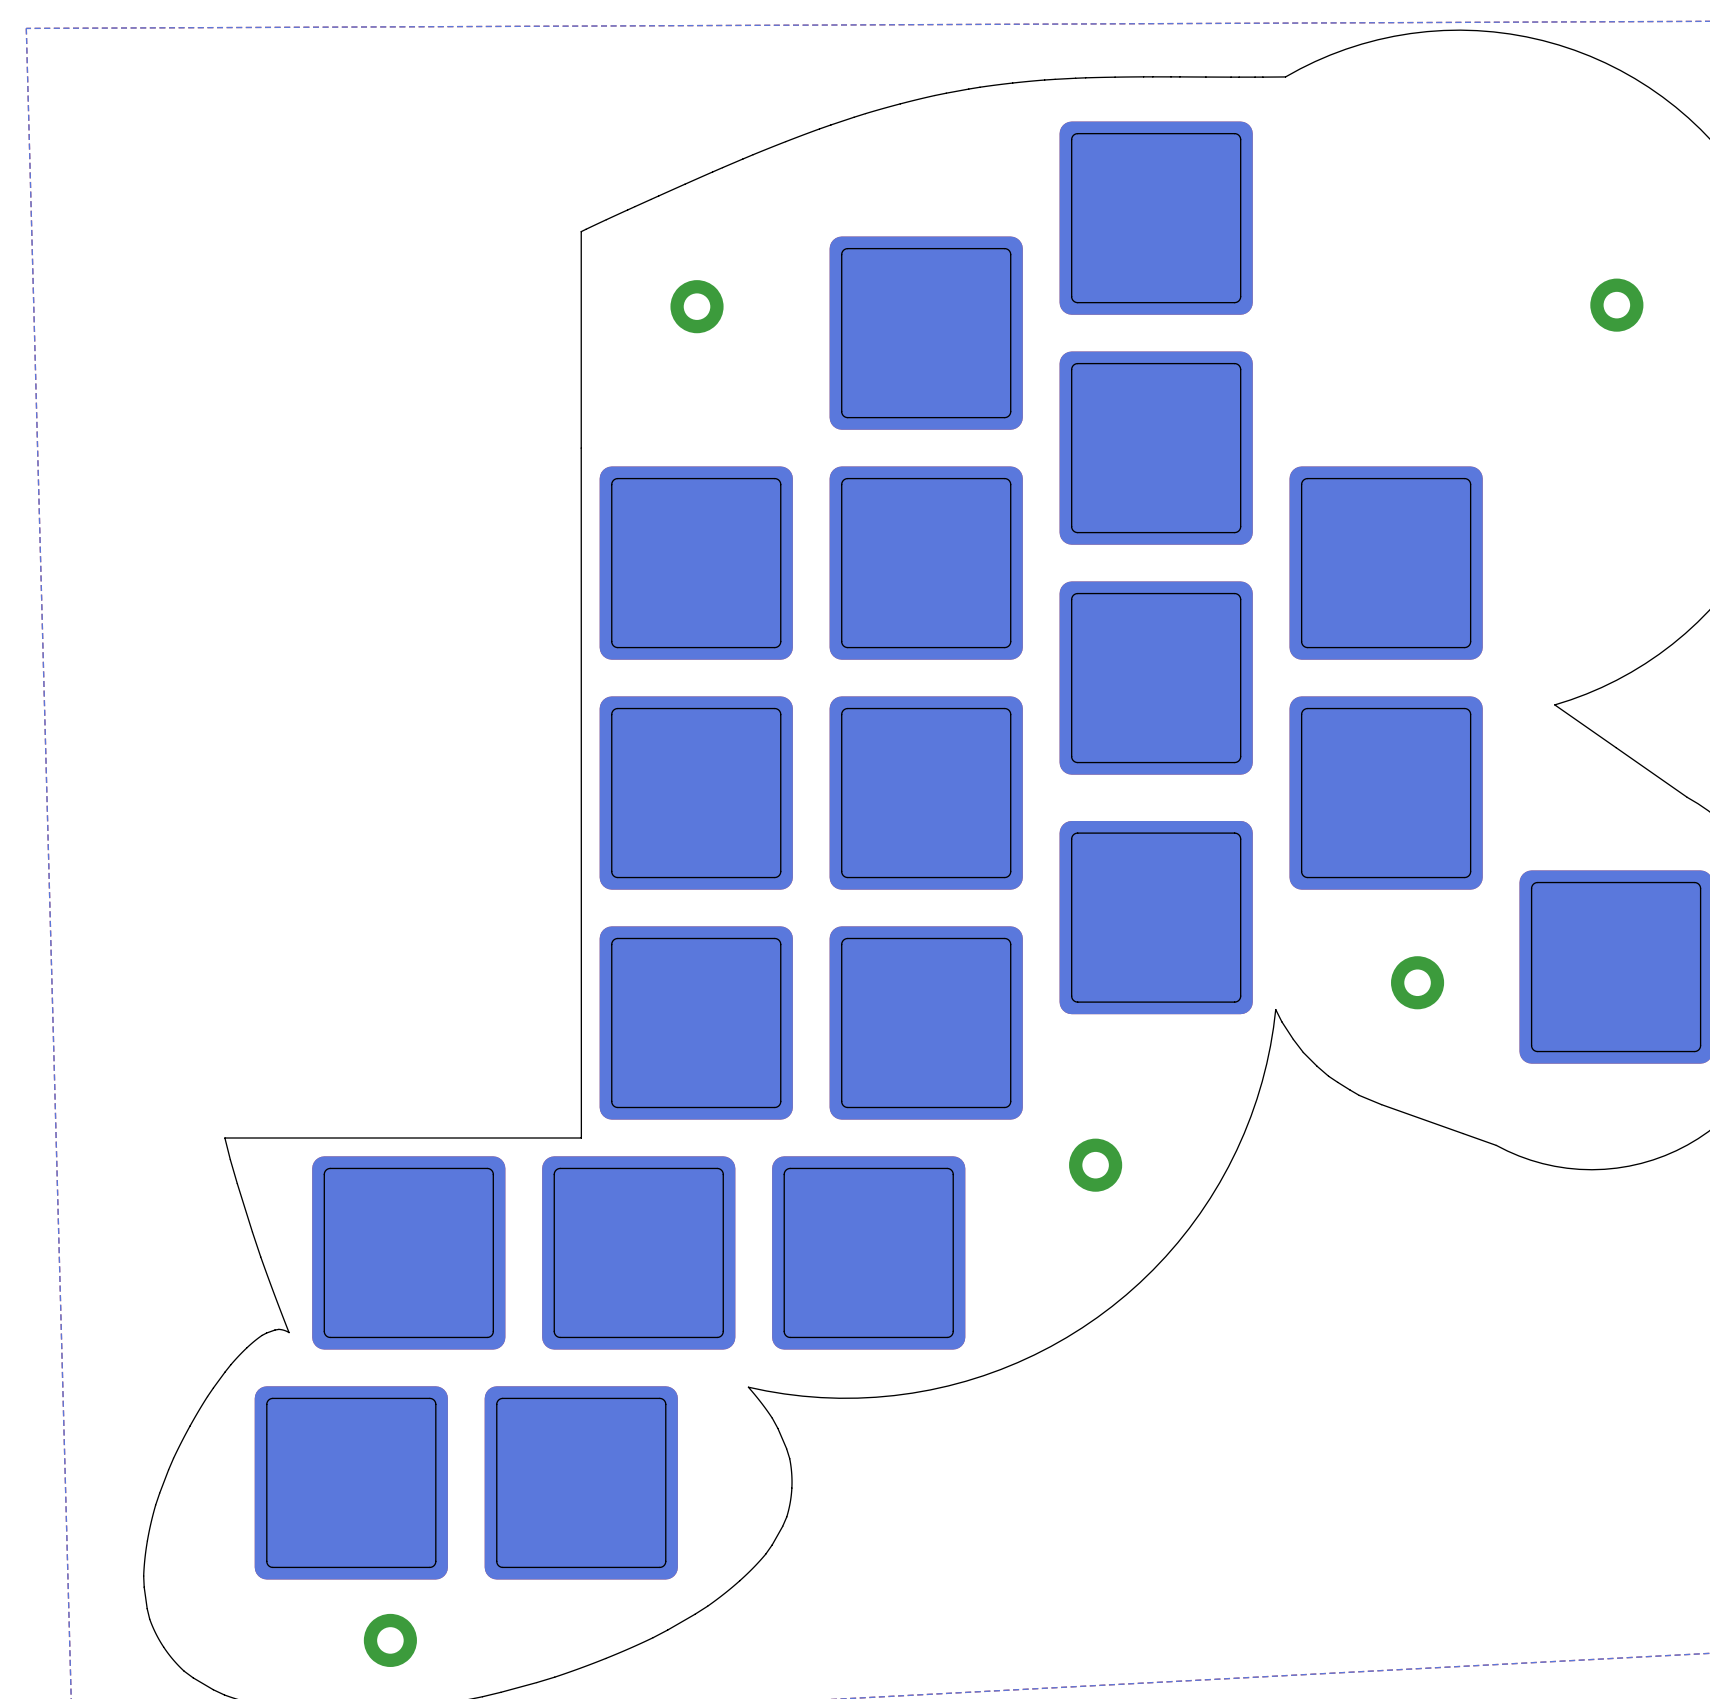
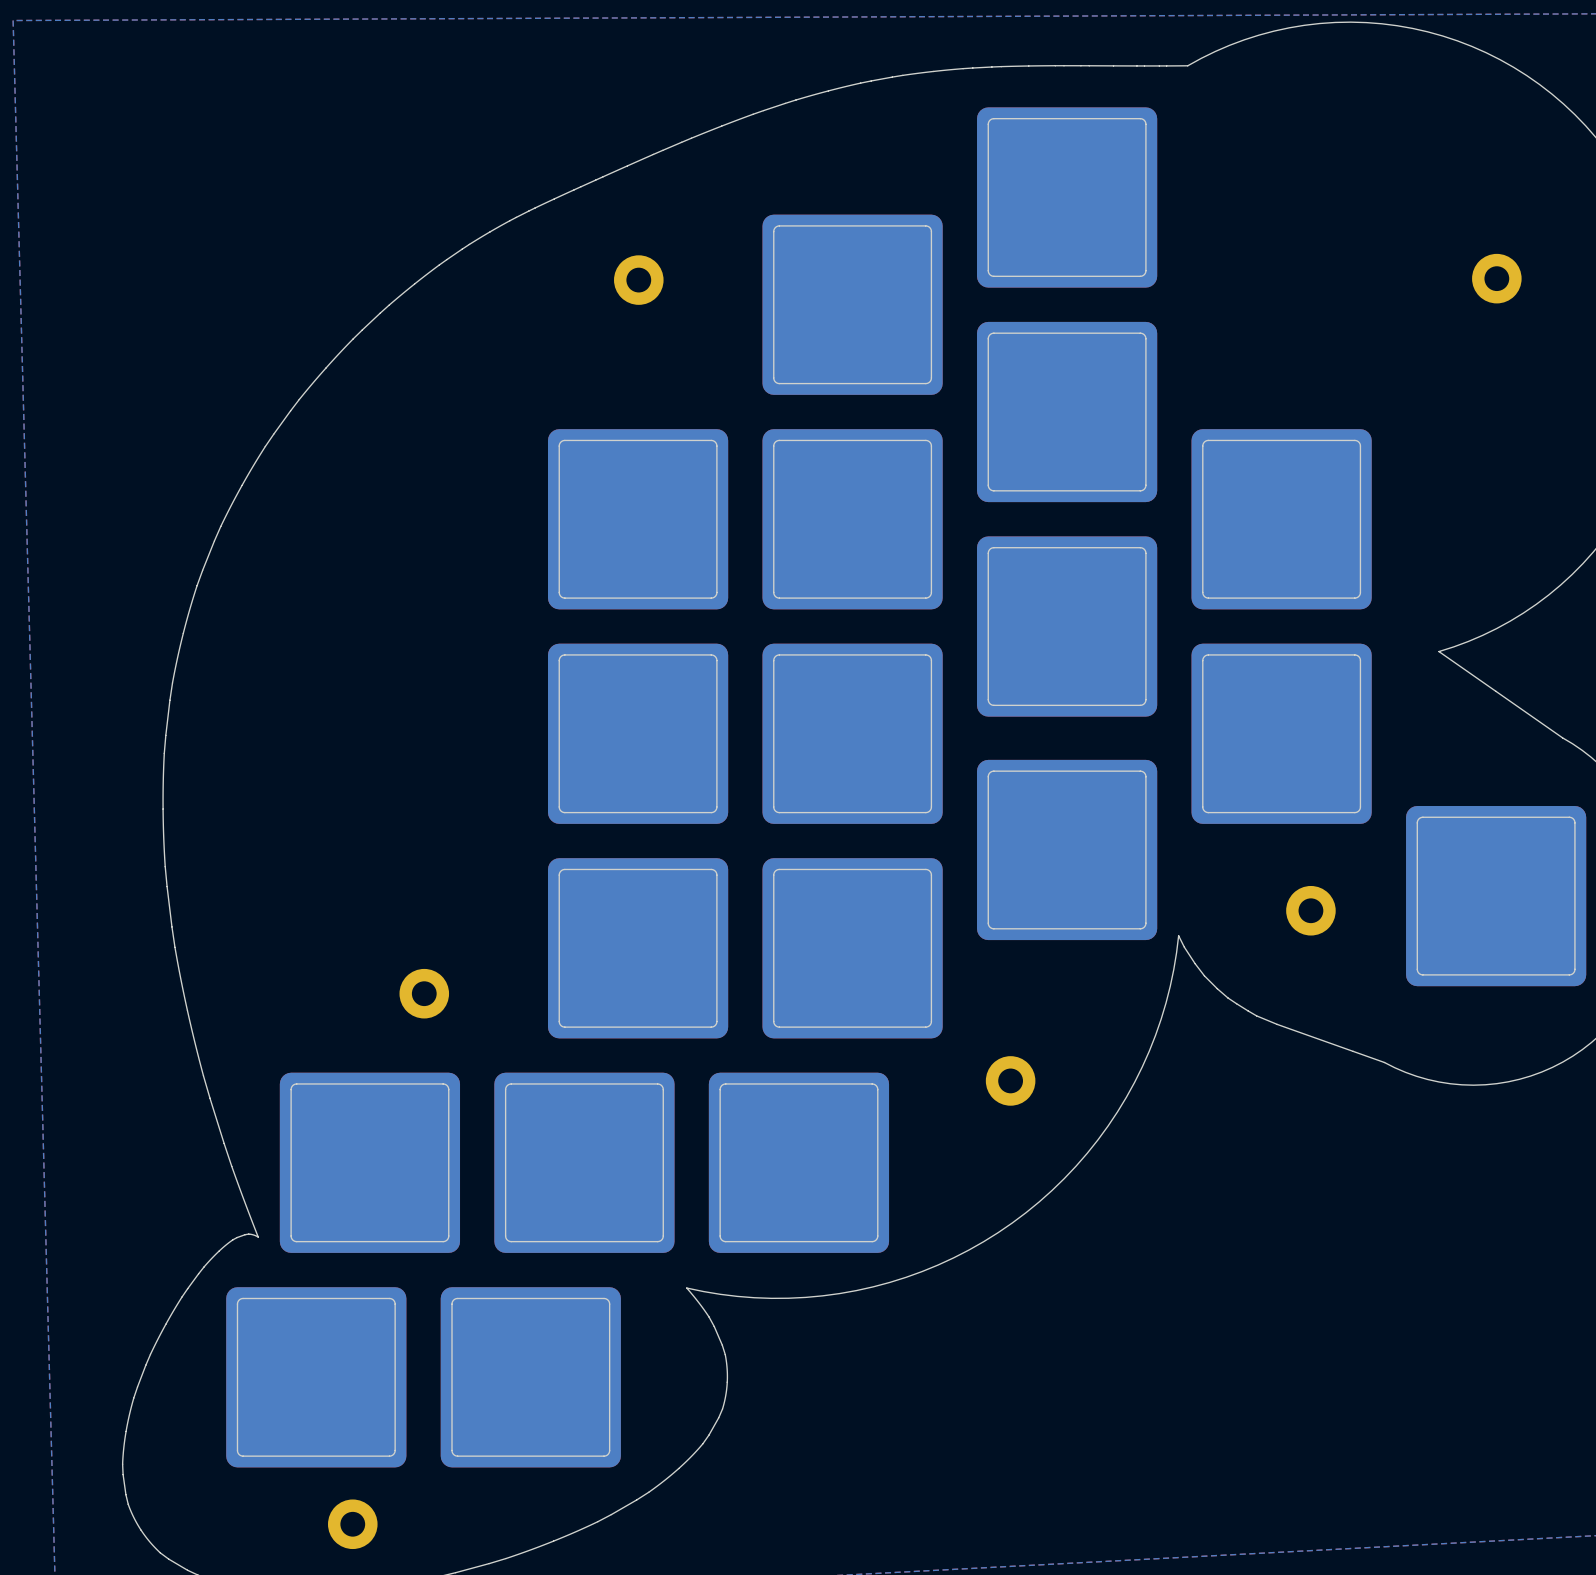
board edge: (581, 231) (581, 1138) (224, 1138) (230, 1159) -> (530, 210) (477, 239) (430, 271) (380, 313) (332, 360) (299, 399) (259, 455) (224, 518) (202, 570) (185, 624) (172, 683) (164, 753) (163, 801) (165, 866) (174, 947) (187, 1010) (203, 1075)
part: none -> (424, 993)

